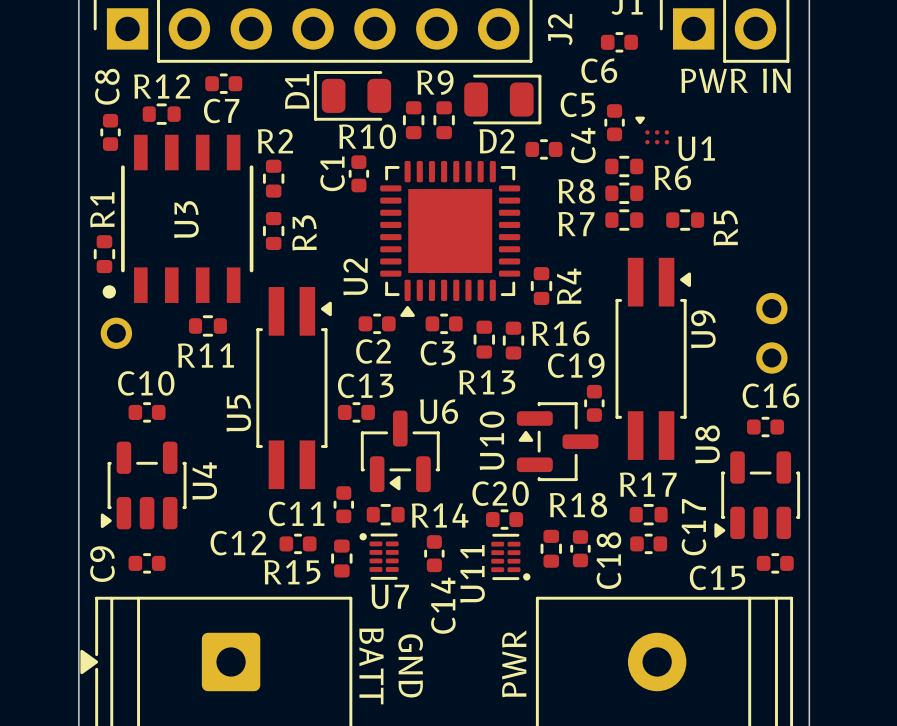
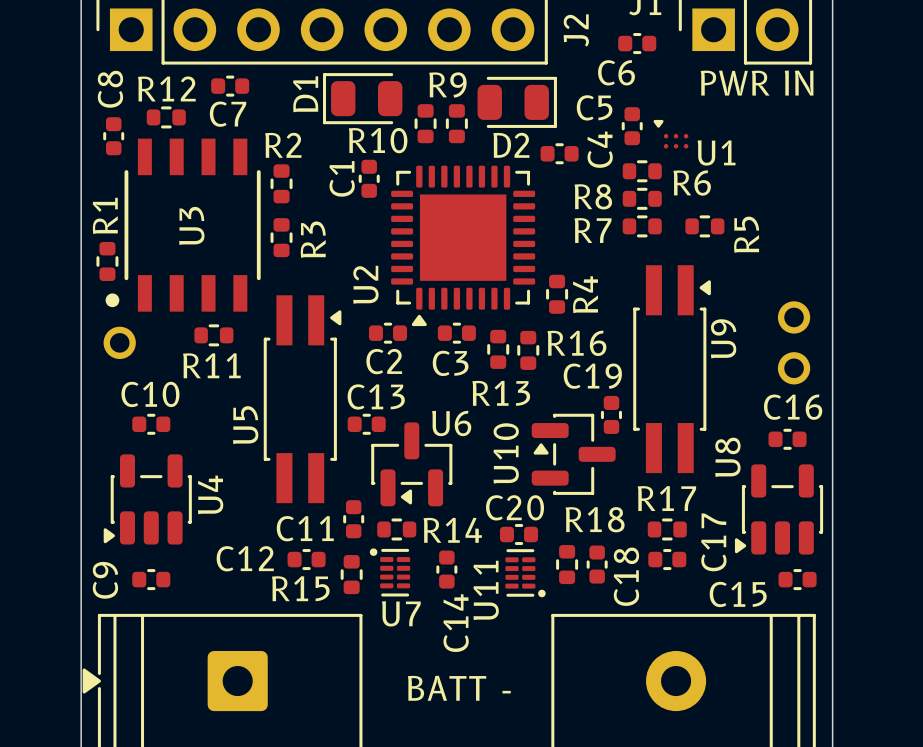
text: PWR (514, 663) -> none
text: GND (410, 665) -> none
text: BATT (371, 666) -> BATT - (459, 688)

